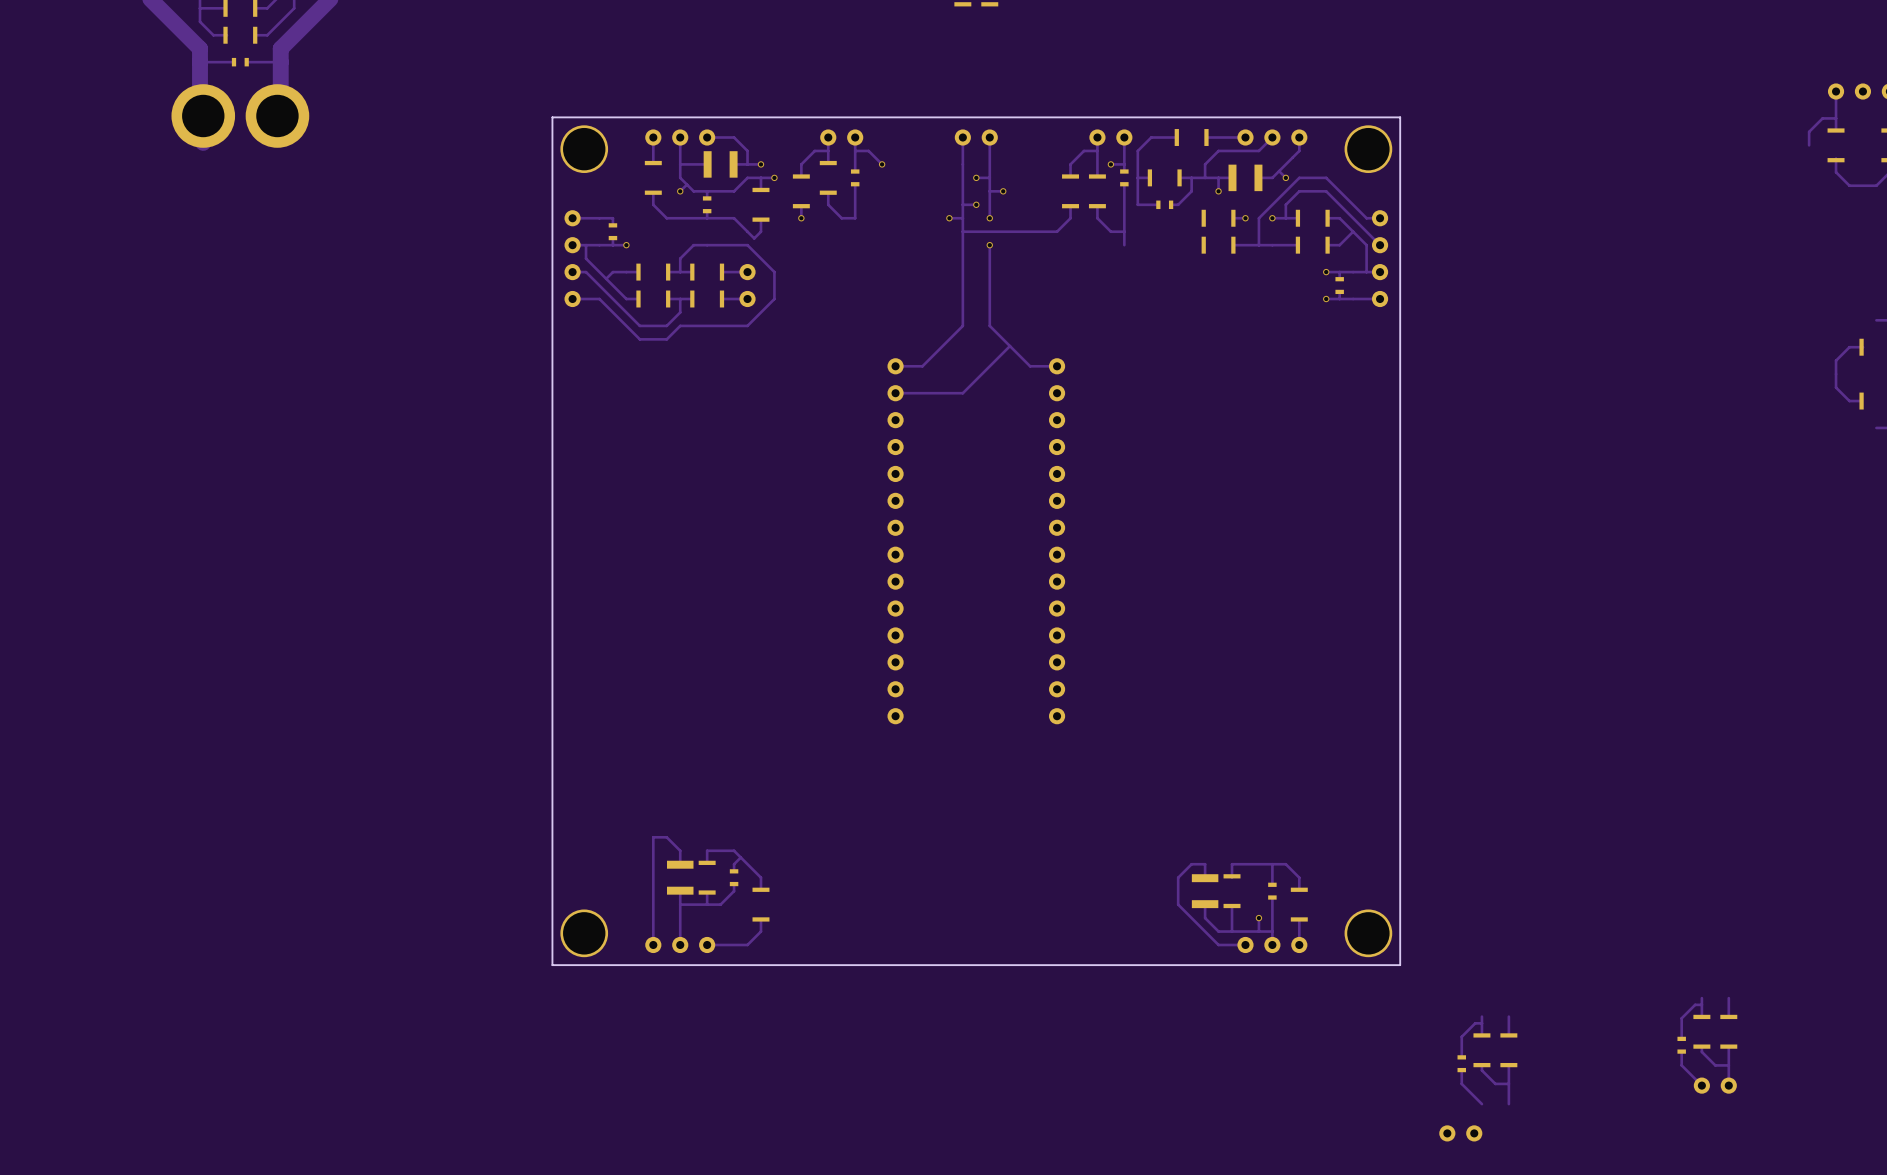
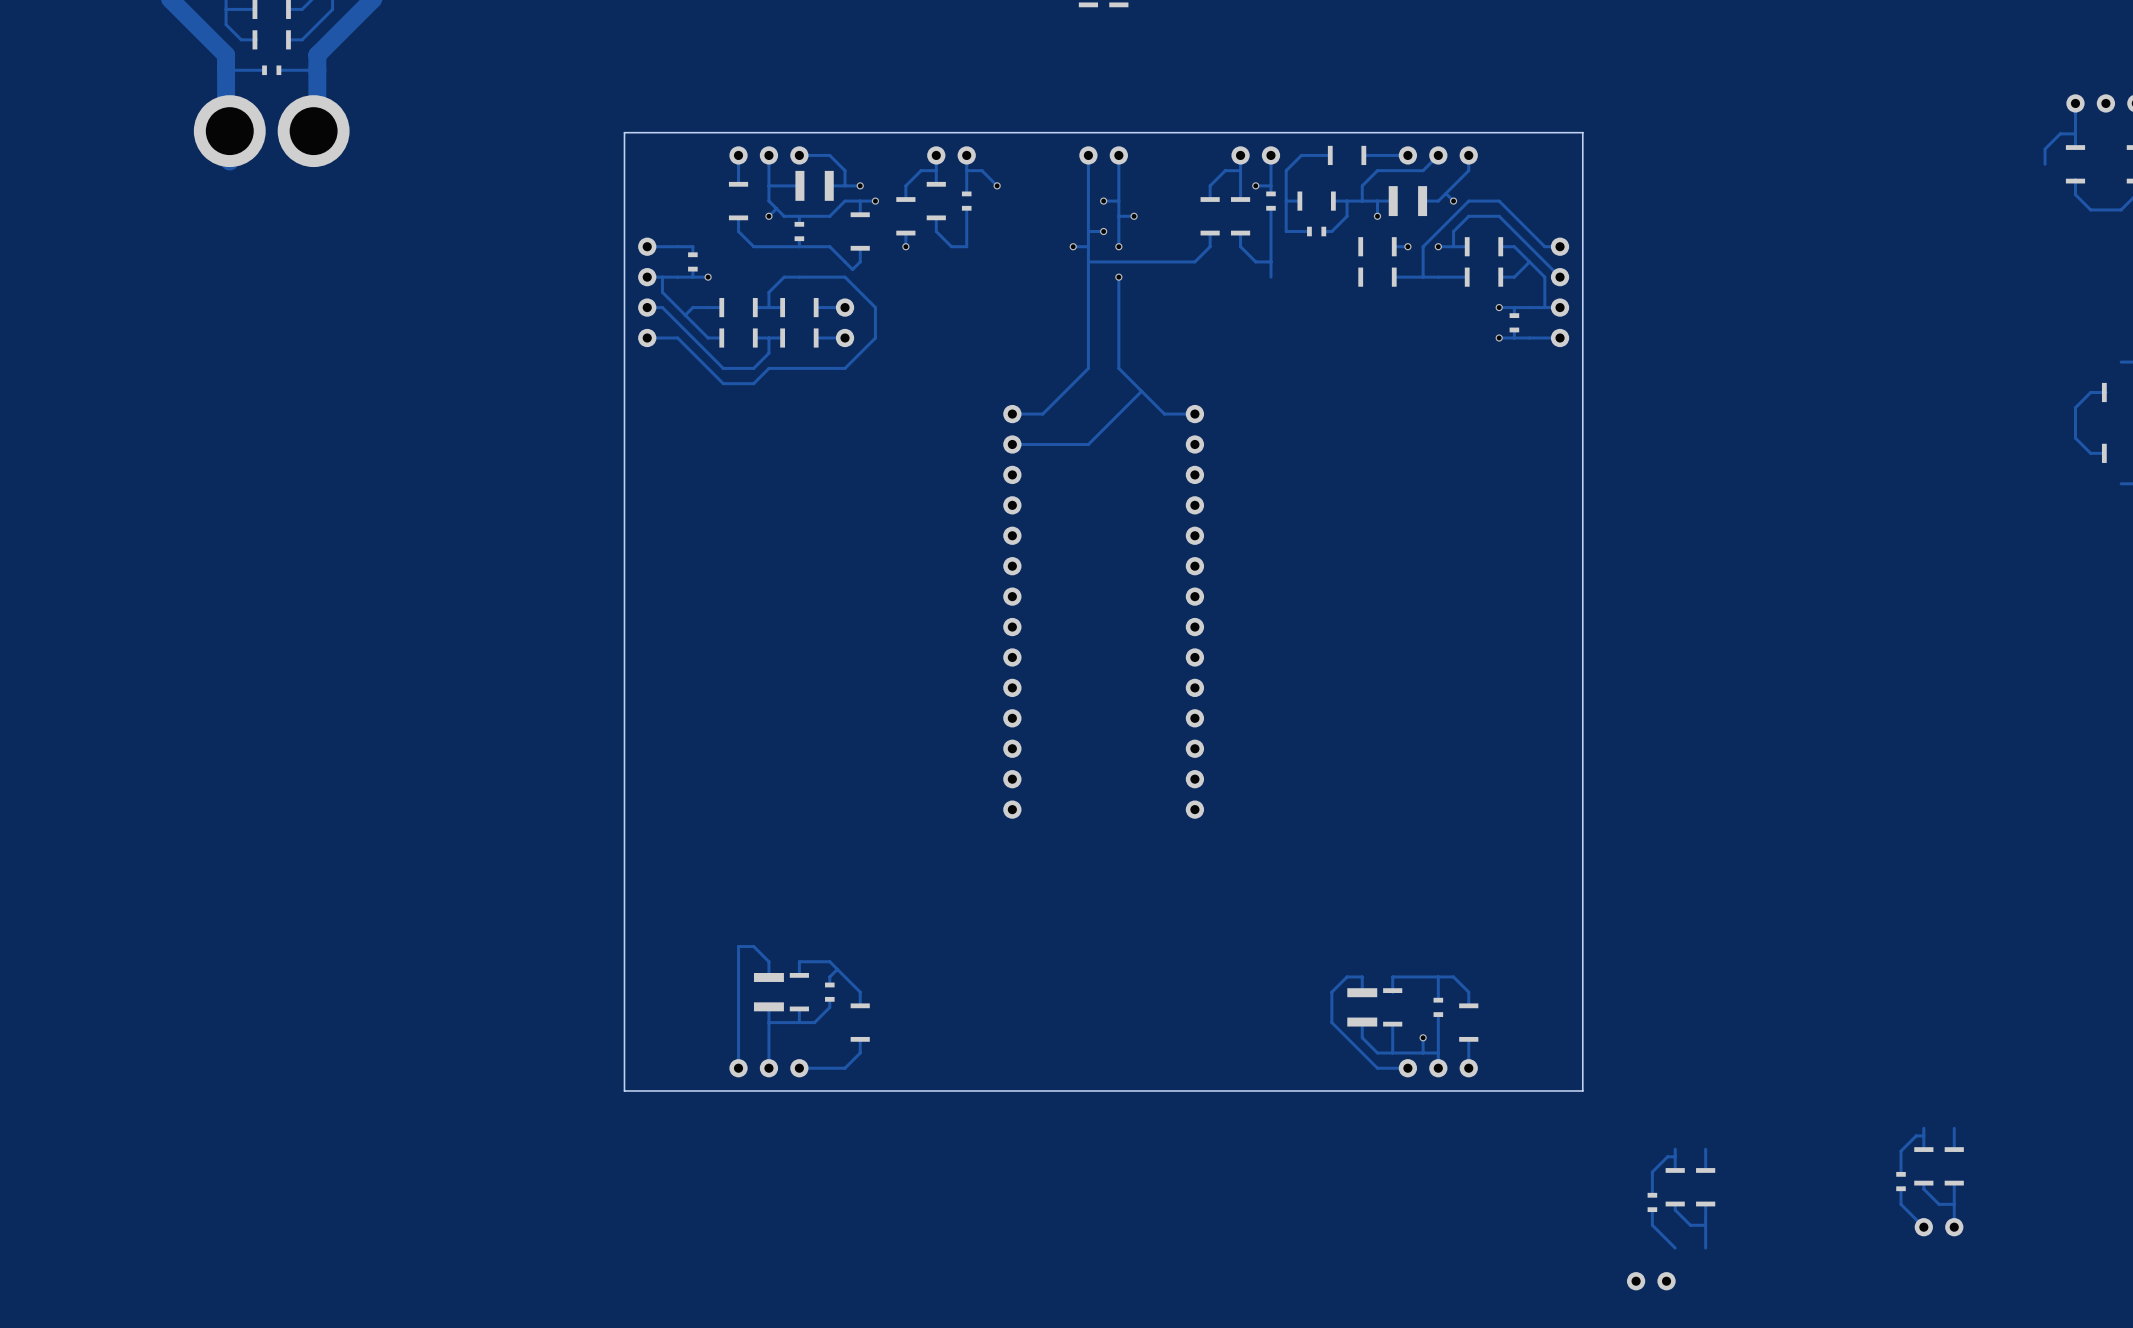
part: (584, 149) -> none
part: (1368, 149) -> none
part: (584, 933) -> none
part: (1368, 933) -> none

